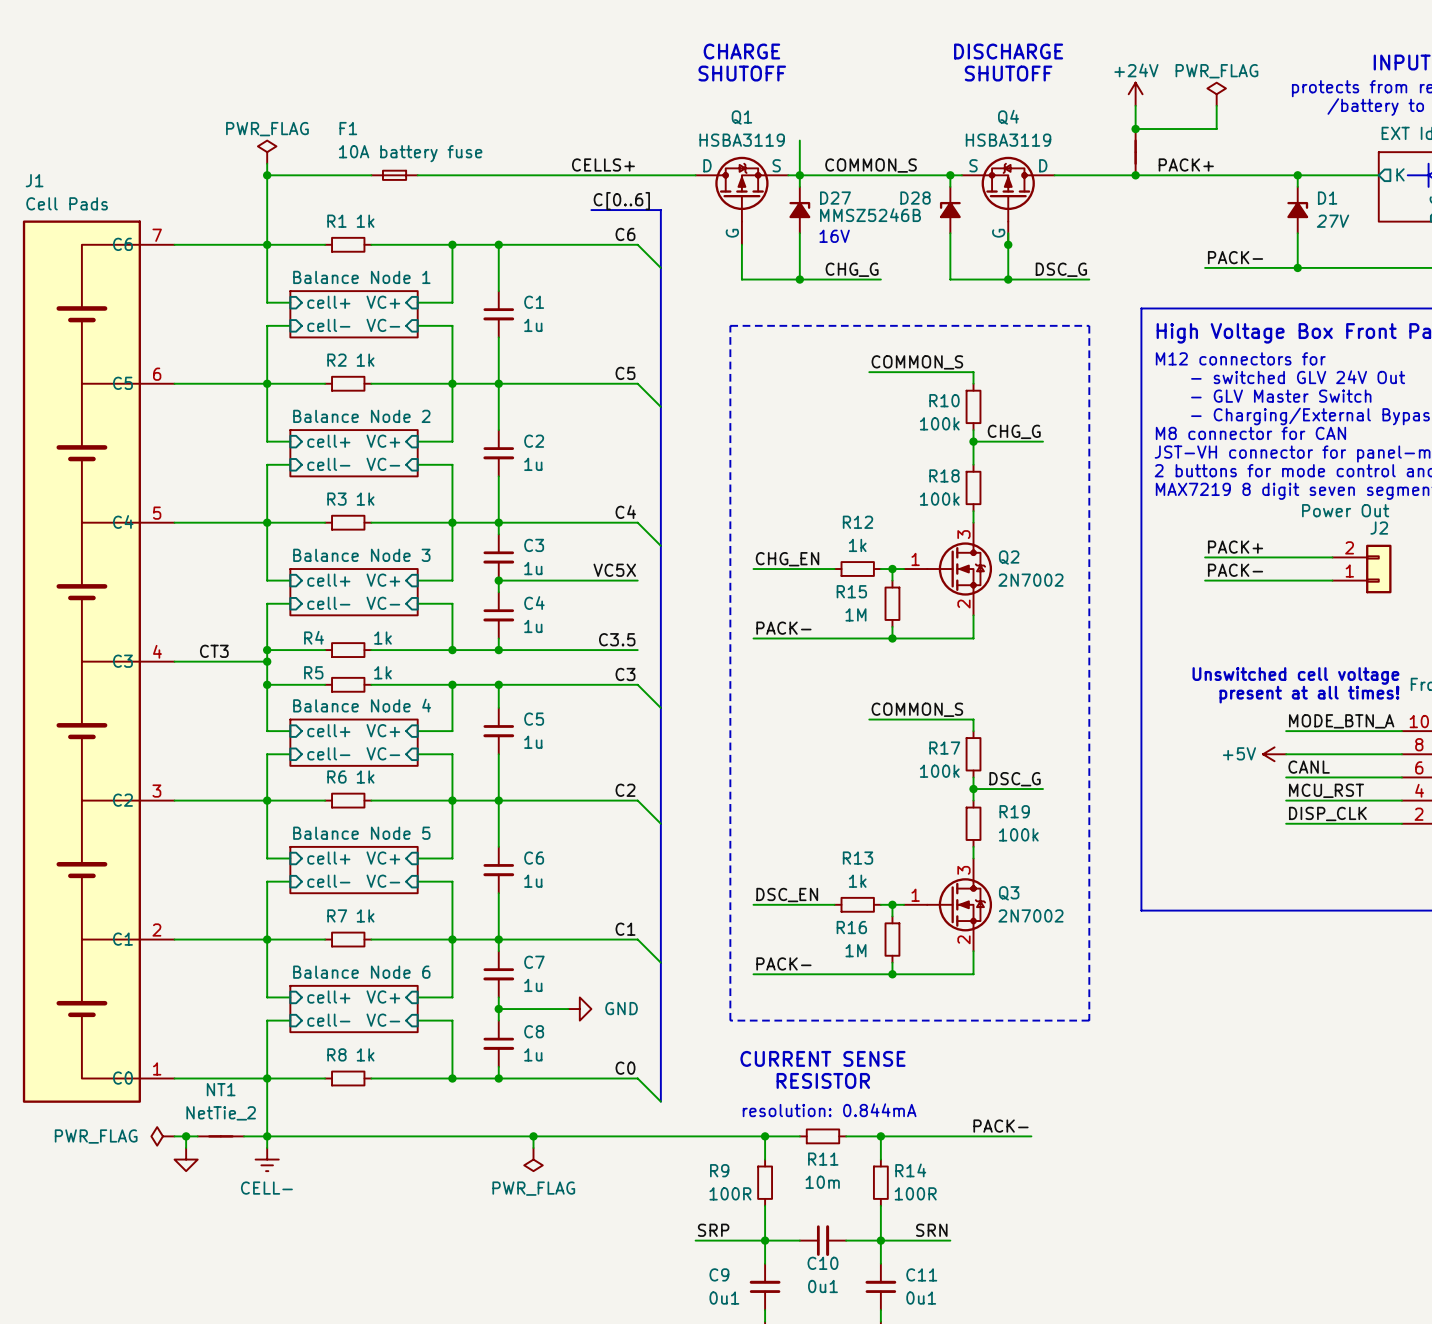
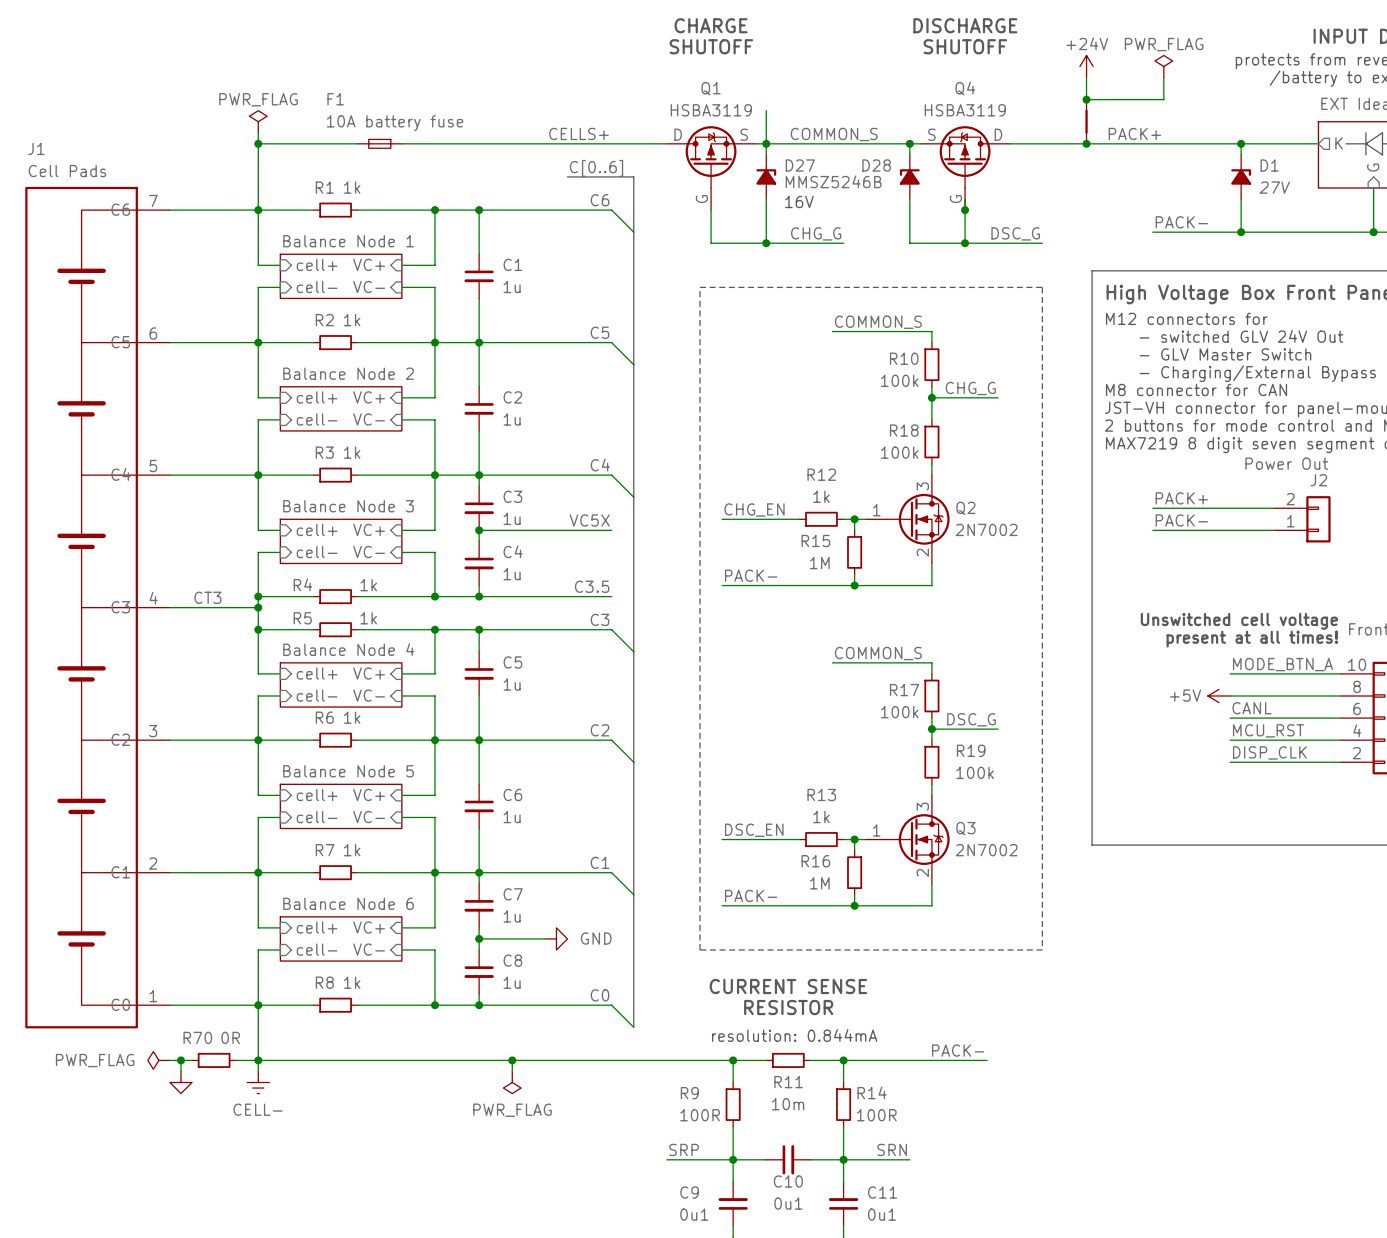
NT1: NetTie_2 (220, 1136) -> none
R70: none -> 0R (214, 1060)

